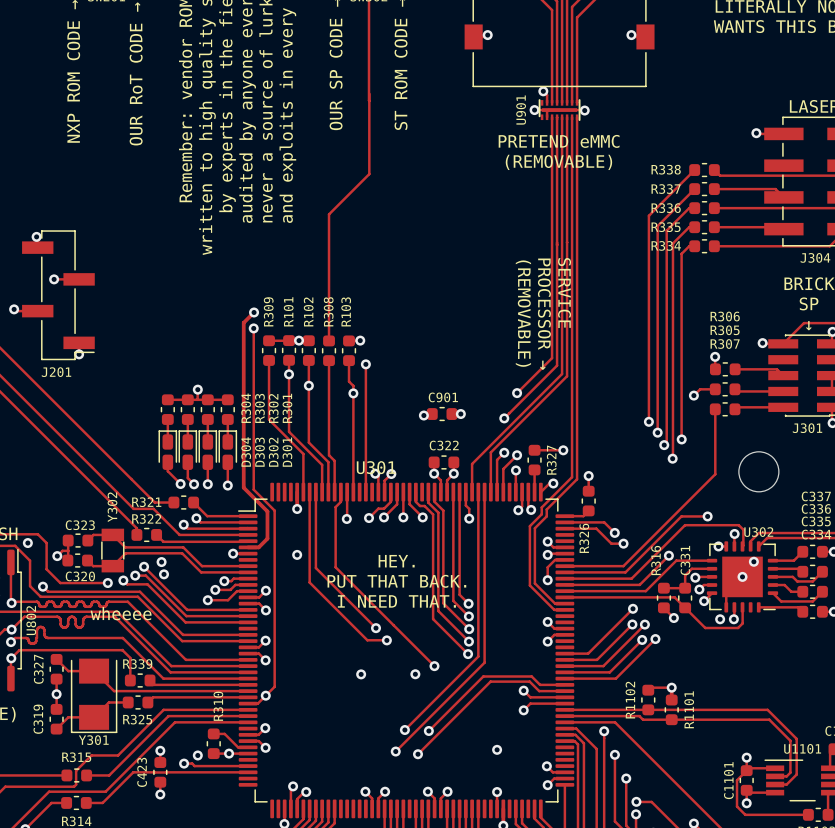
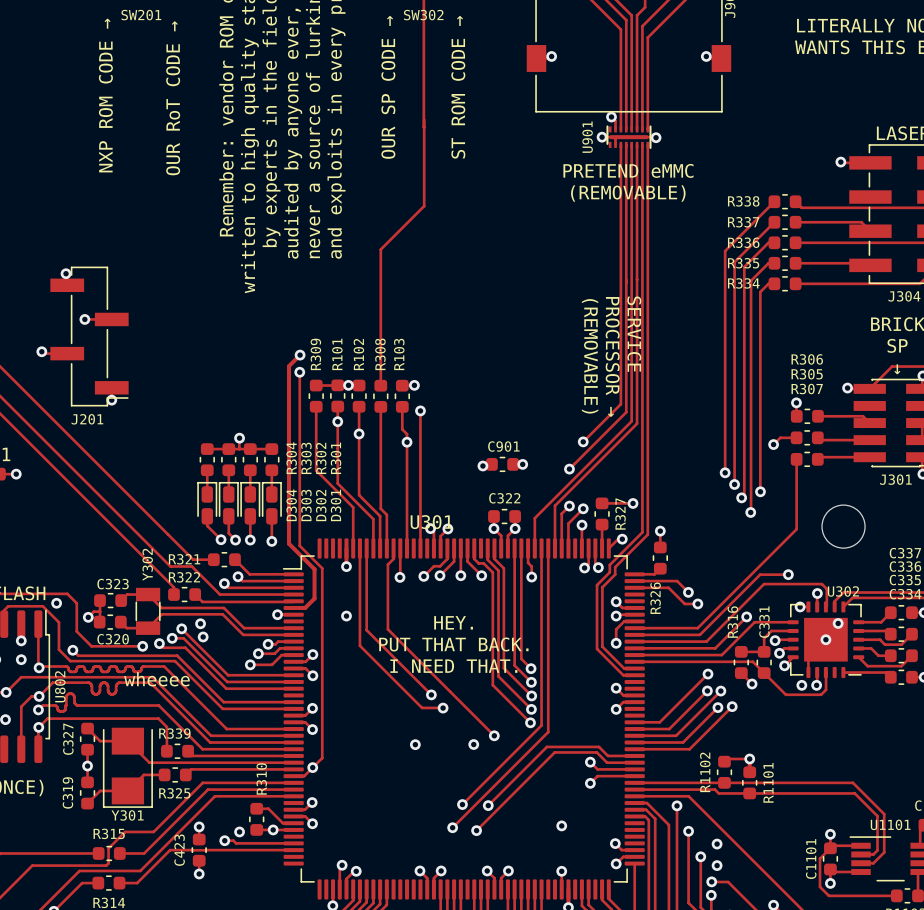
via: none -> (717, 844)
via: none -> (717, 865)

